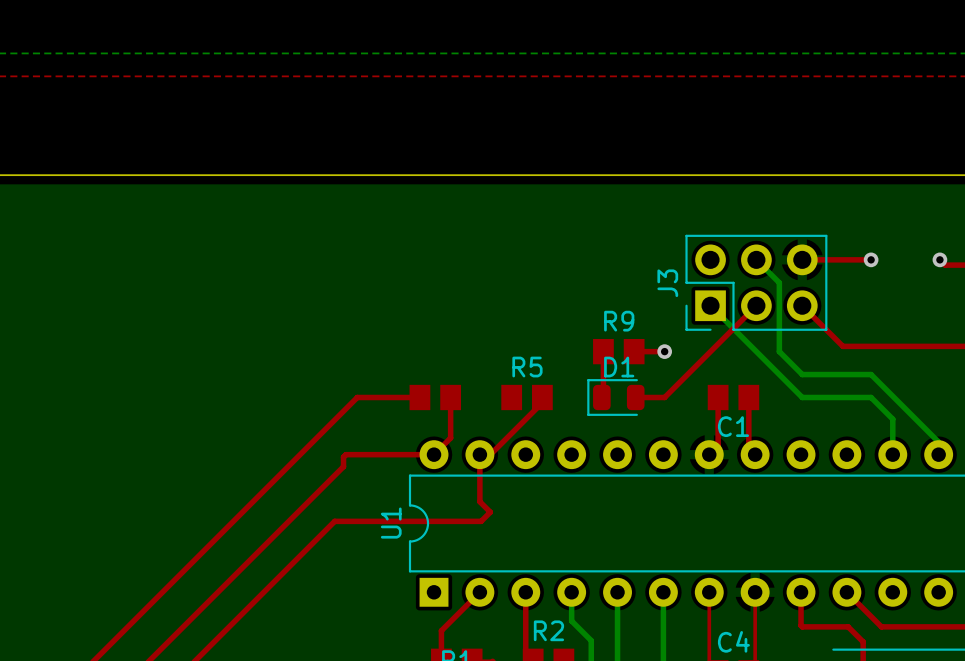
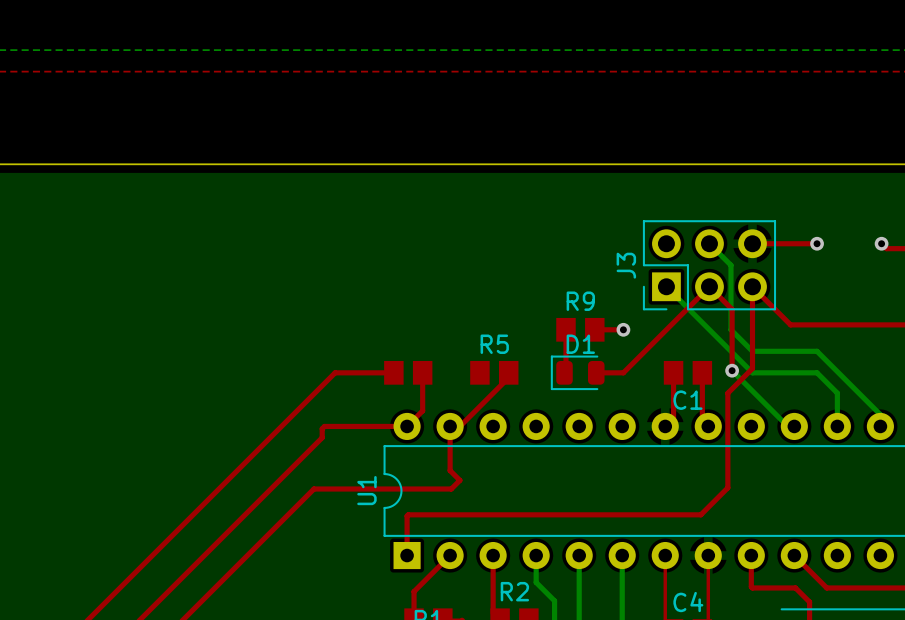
top track: none -> (709, 286) (732, 309) (732, 370)
top track: none -> (752, 286) (752, 368) (727, 393) (727, 487) (700, 514) (408, 514) (407, 555)
bottom track: none -> (732, 370) (787, 426) (794, 426)
via: none -> (732, 370)

